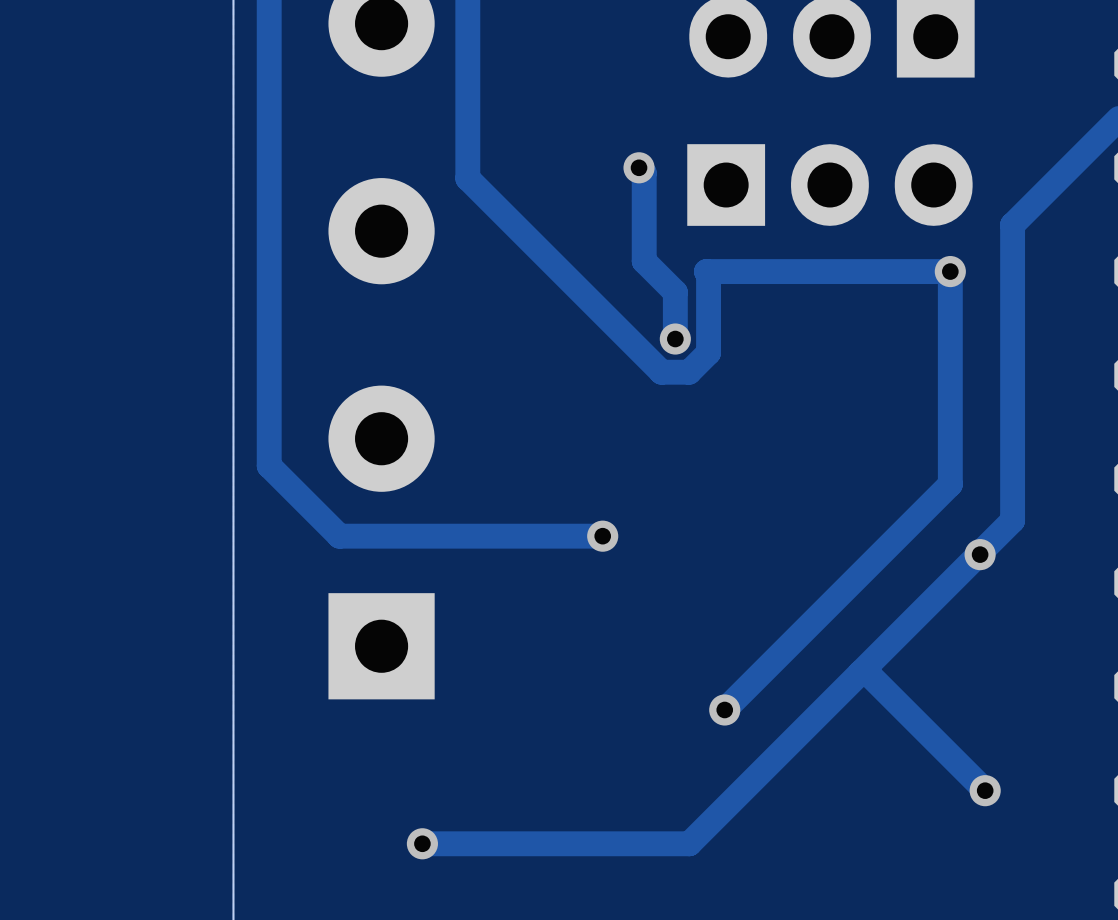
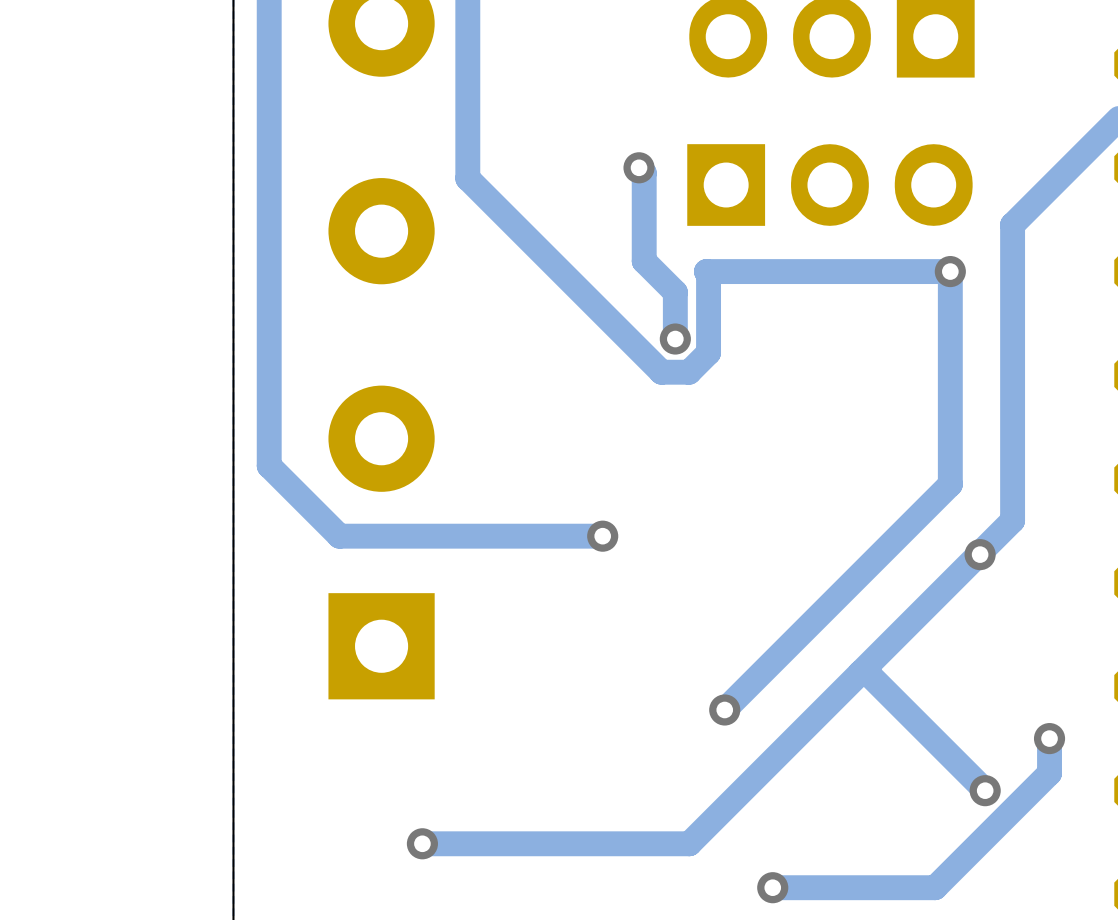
track: none -> (1049, 738) (1049, 773) (935, 887) (772, 887)
via: none -> (1049, 738)
via: none -> (772, 887)

